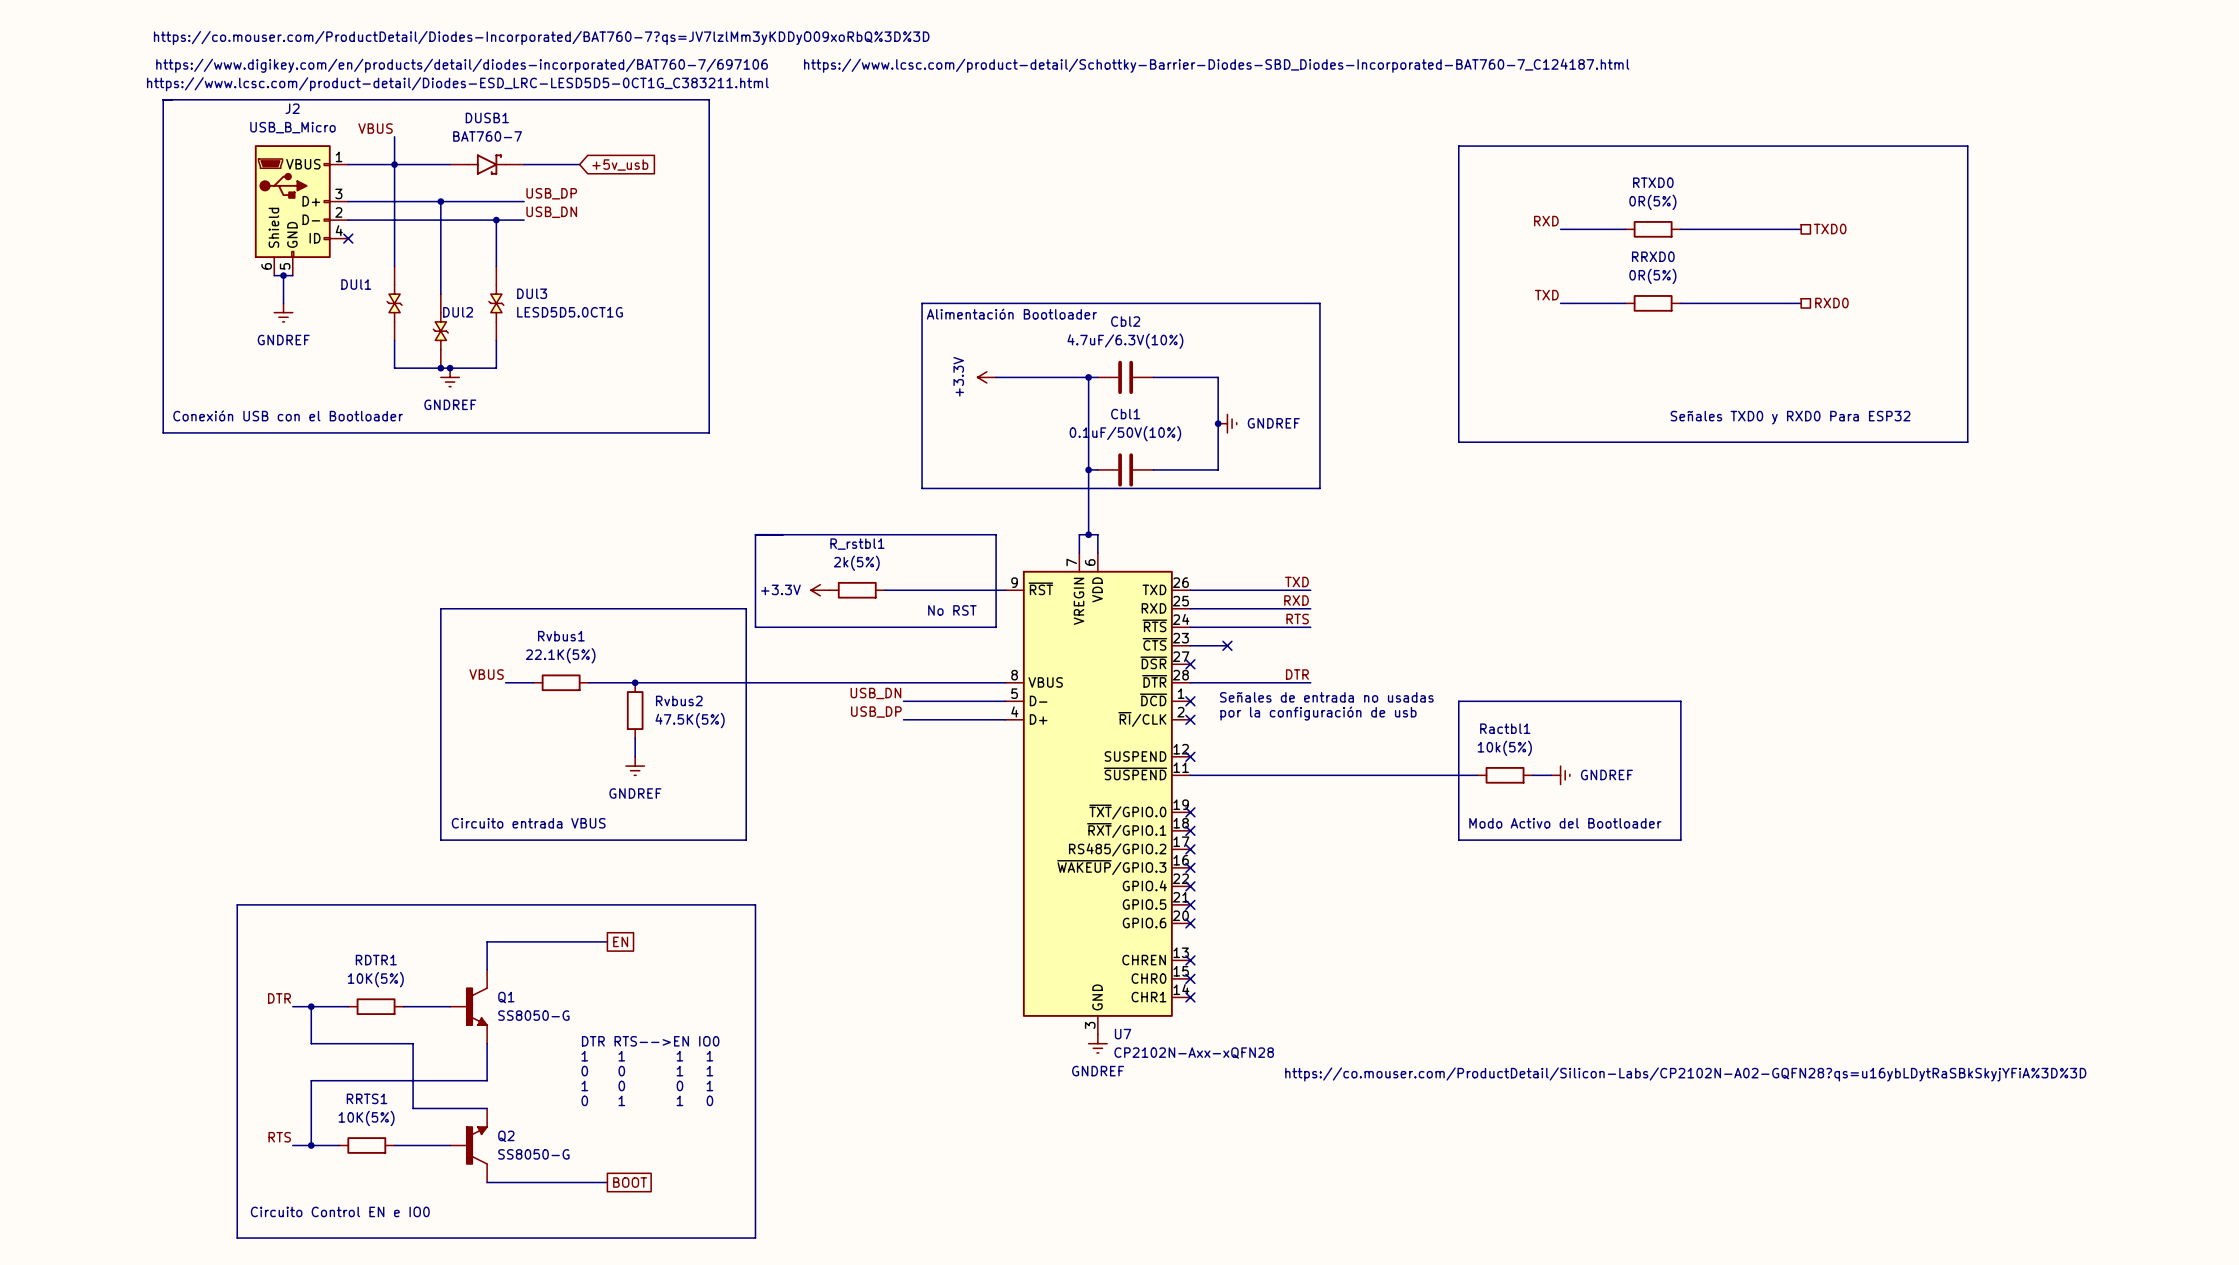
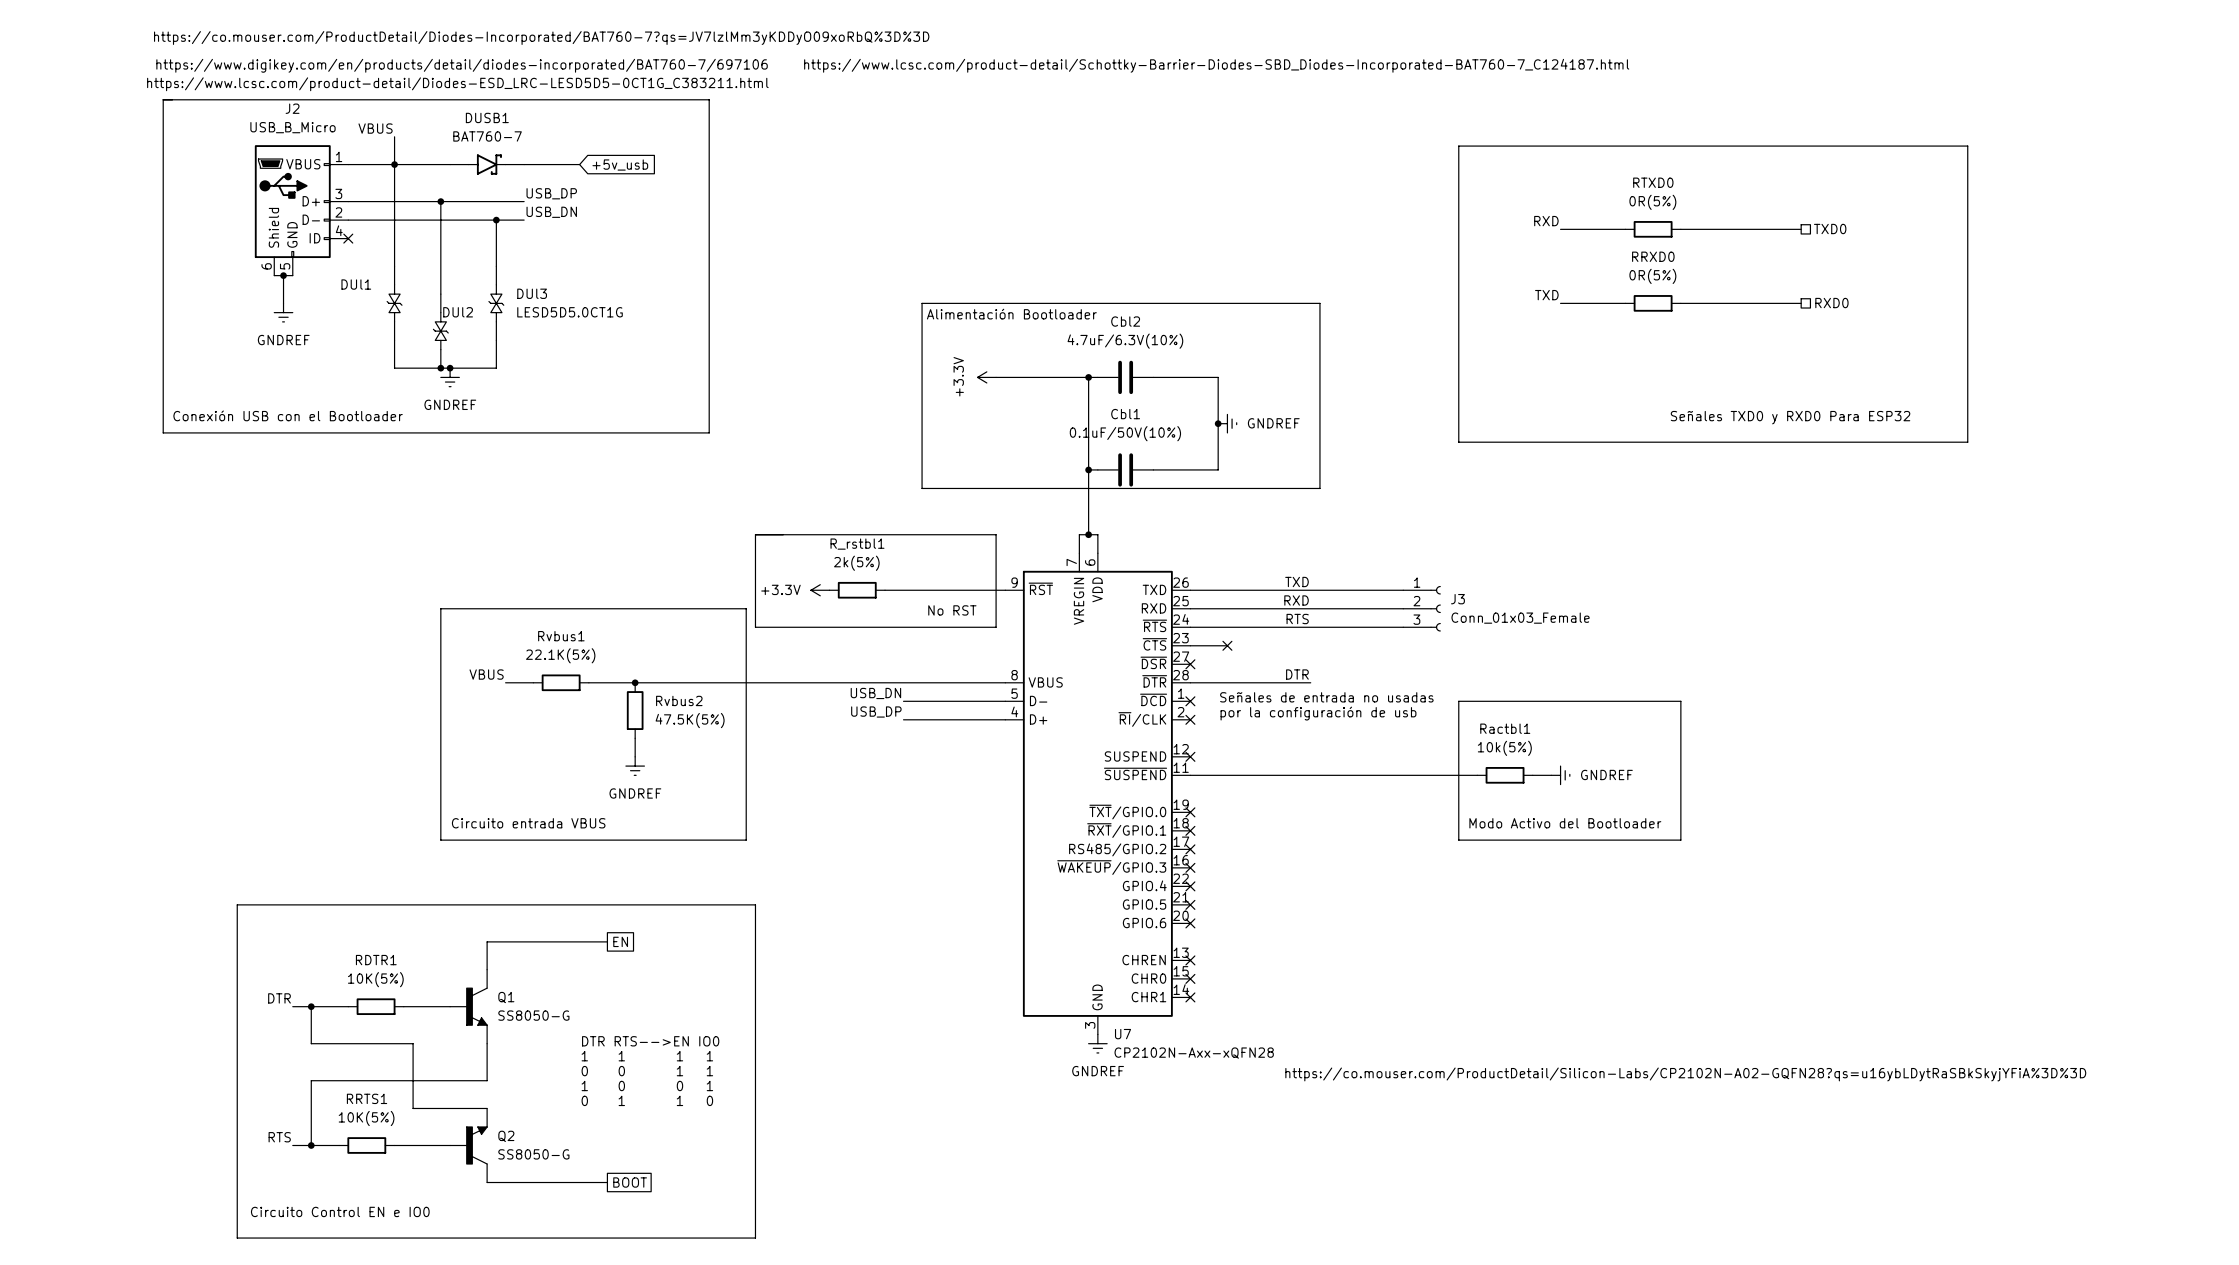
wire: none -> (1310, 590) (1403, 590)
wire: none -> (1310, 608) (1403, 608)
J3: none -> Conn_01x03_Female (1422, 608)
wire: none -> (1310, 627) (1403, 627)

